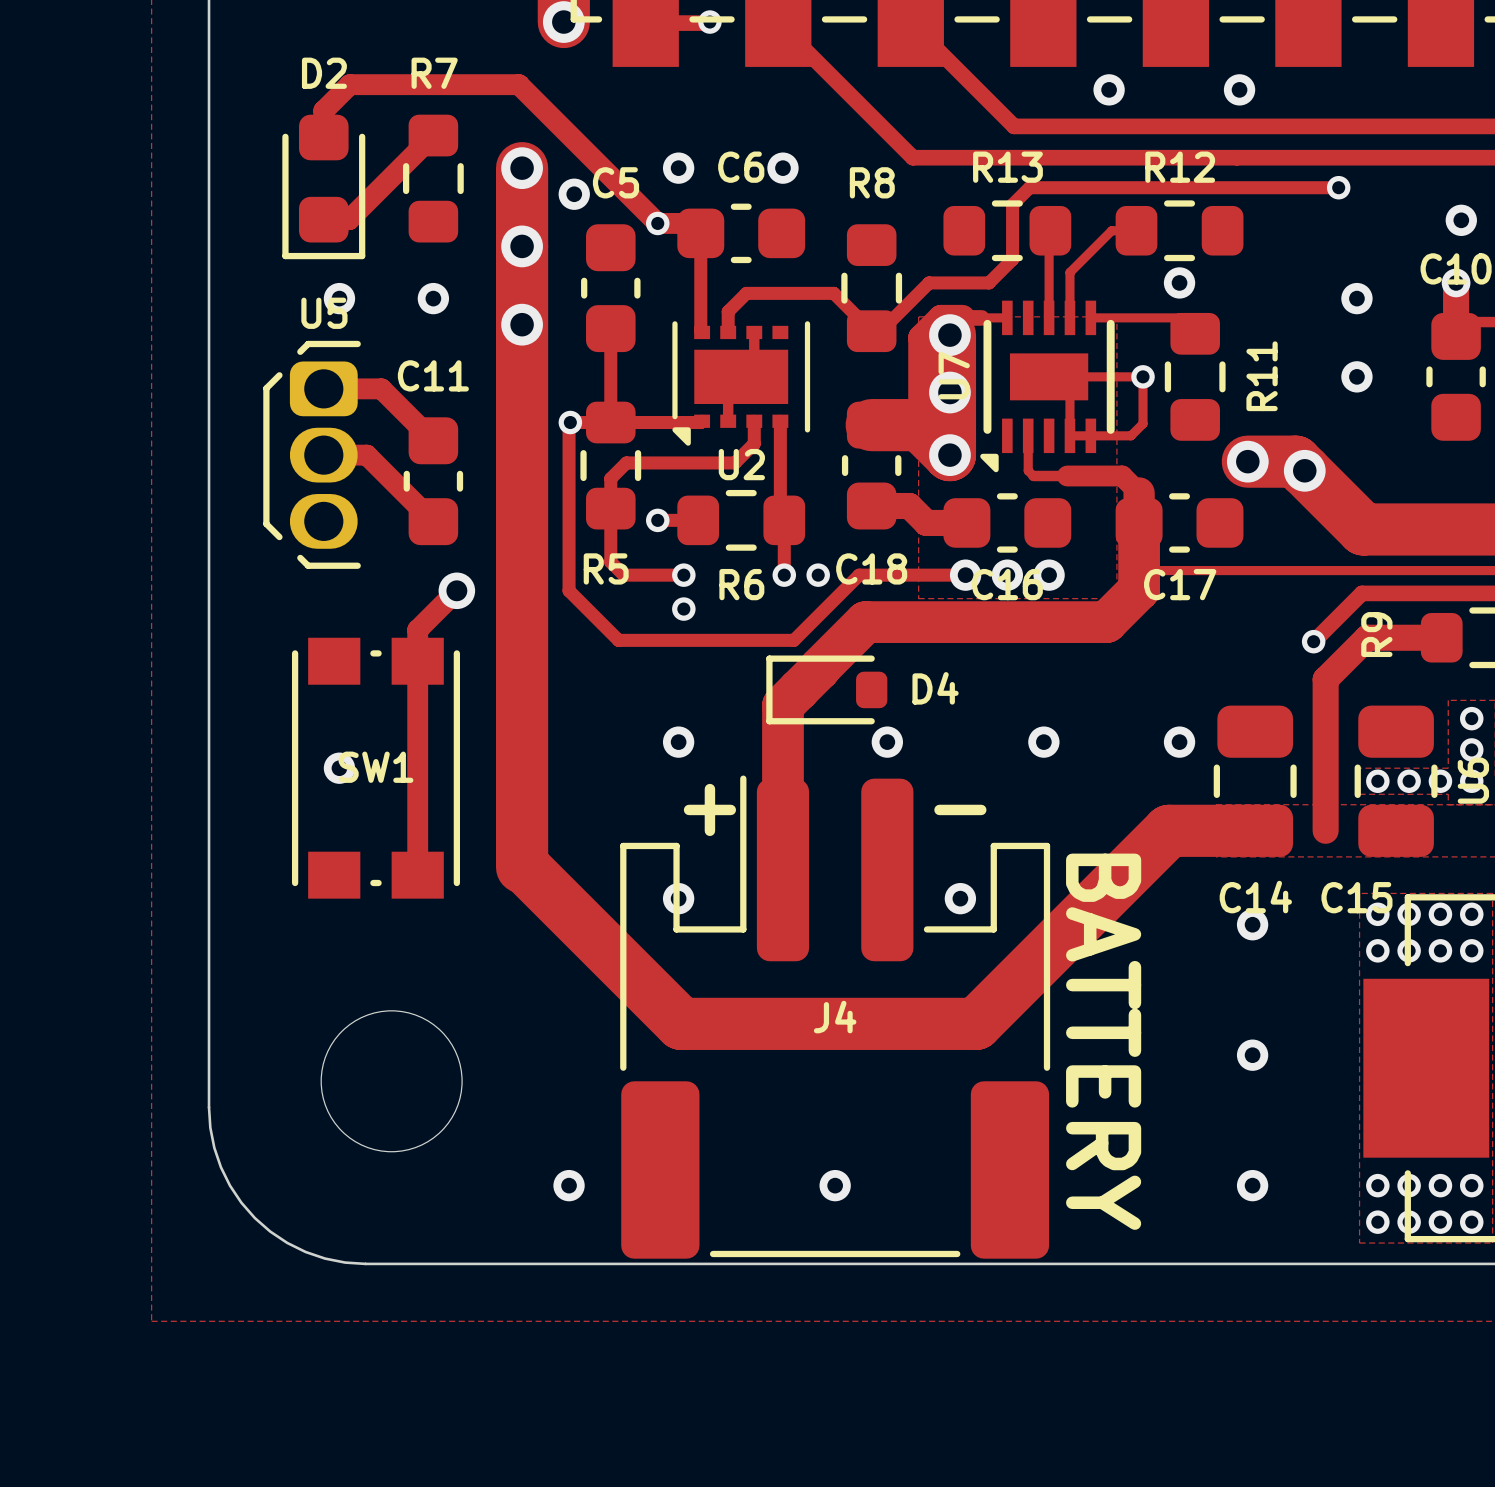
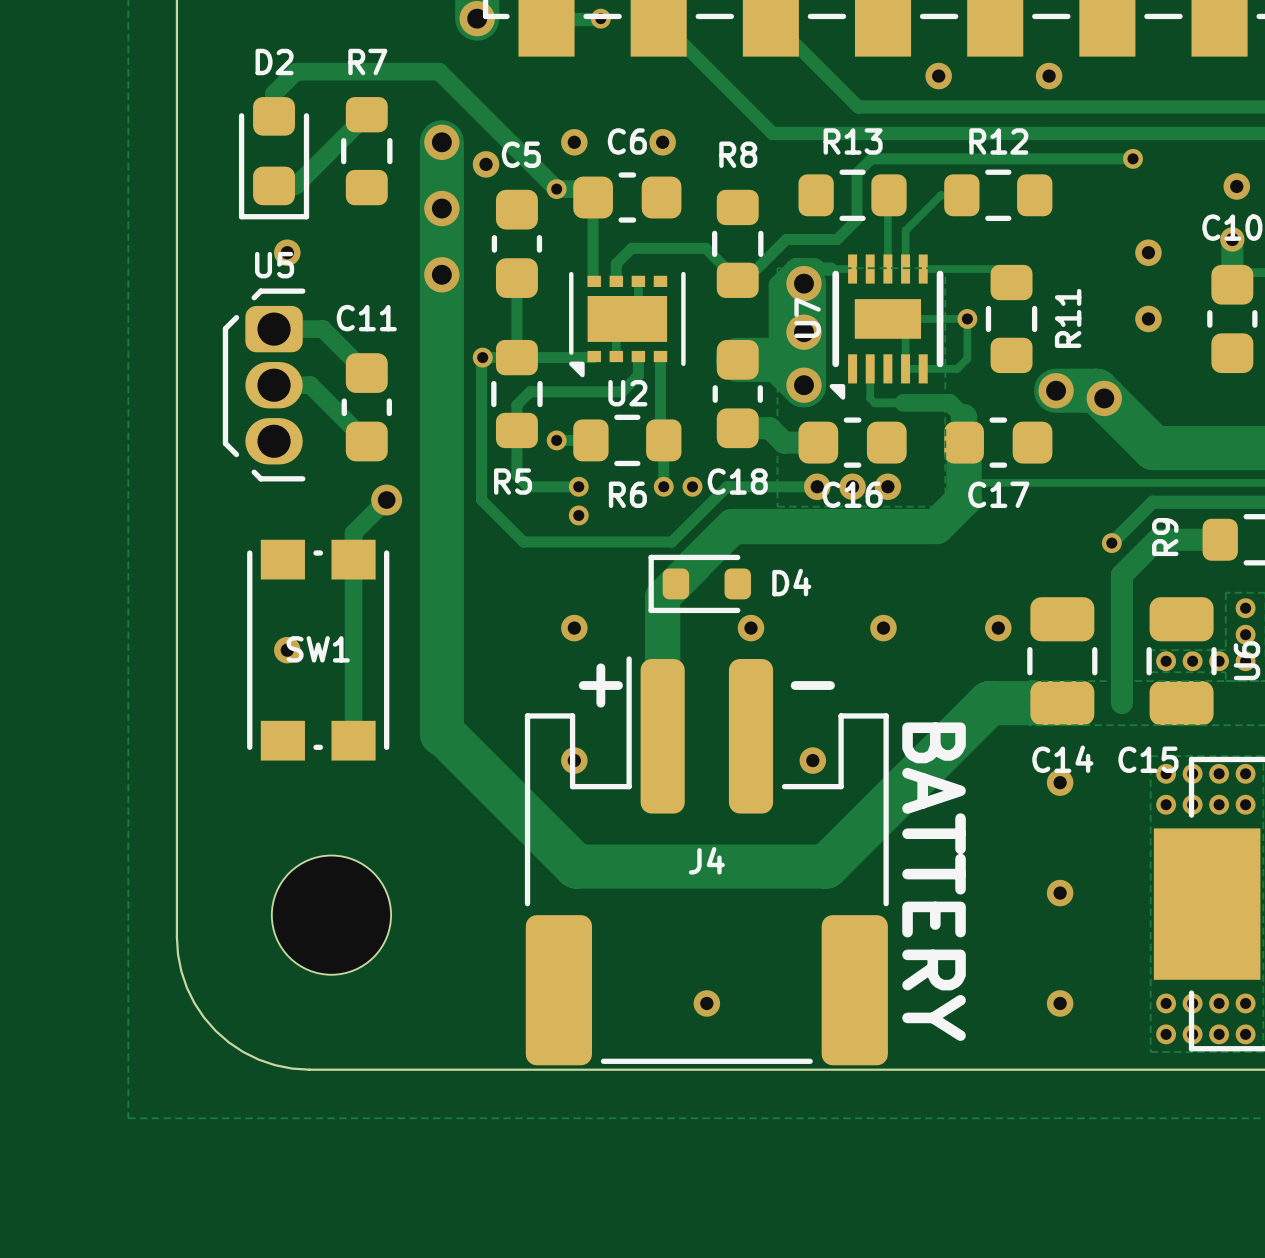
via: (1179, 282) -> none
via: (433, 298) -> none
via: (569, 1185) -> none

